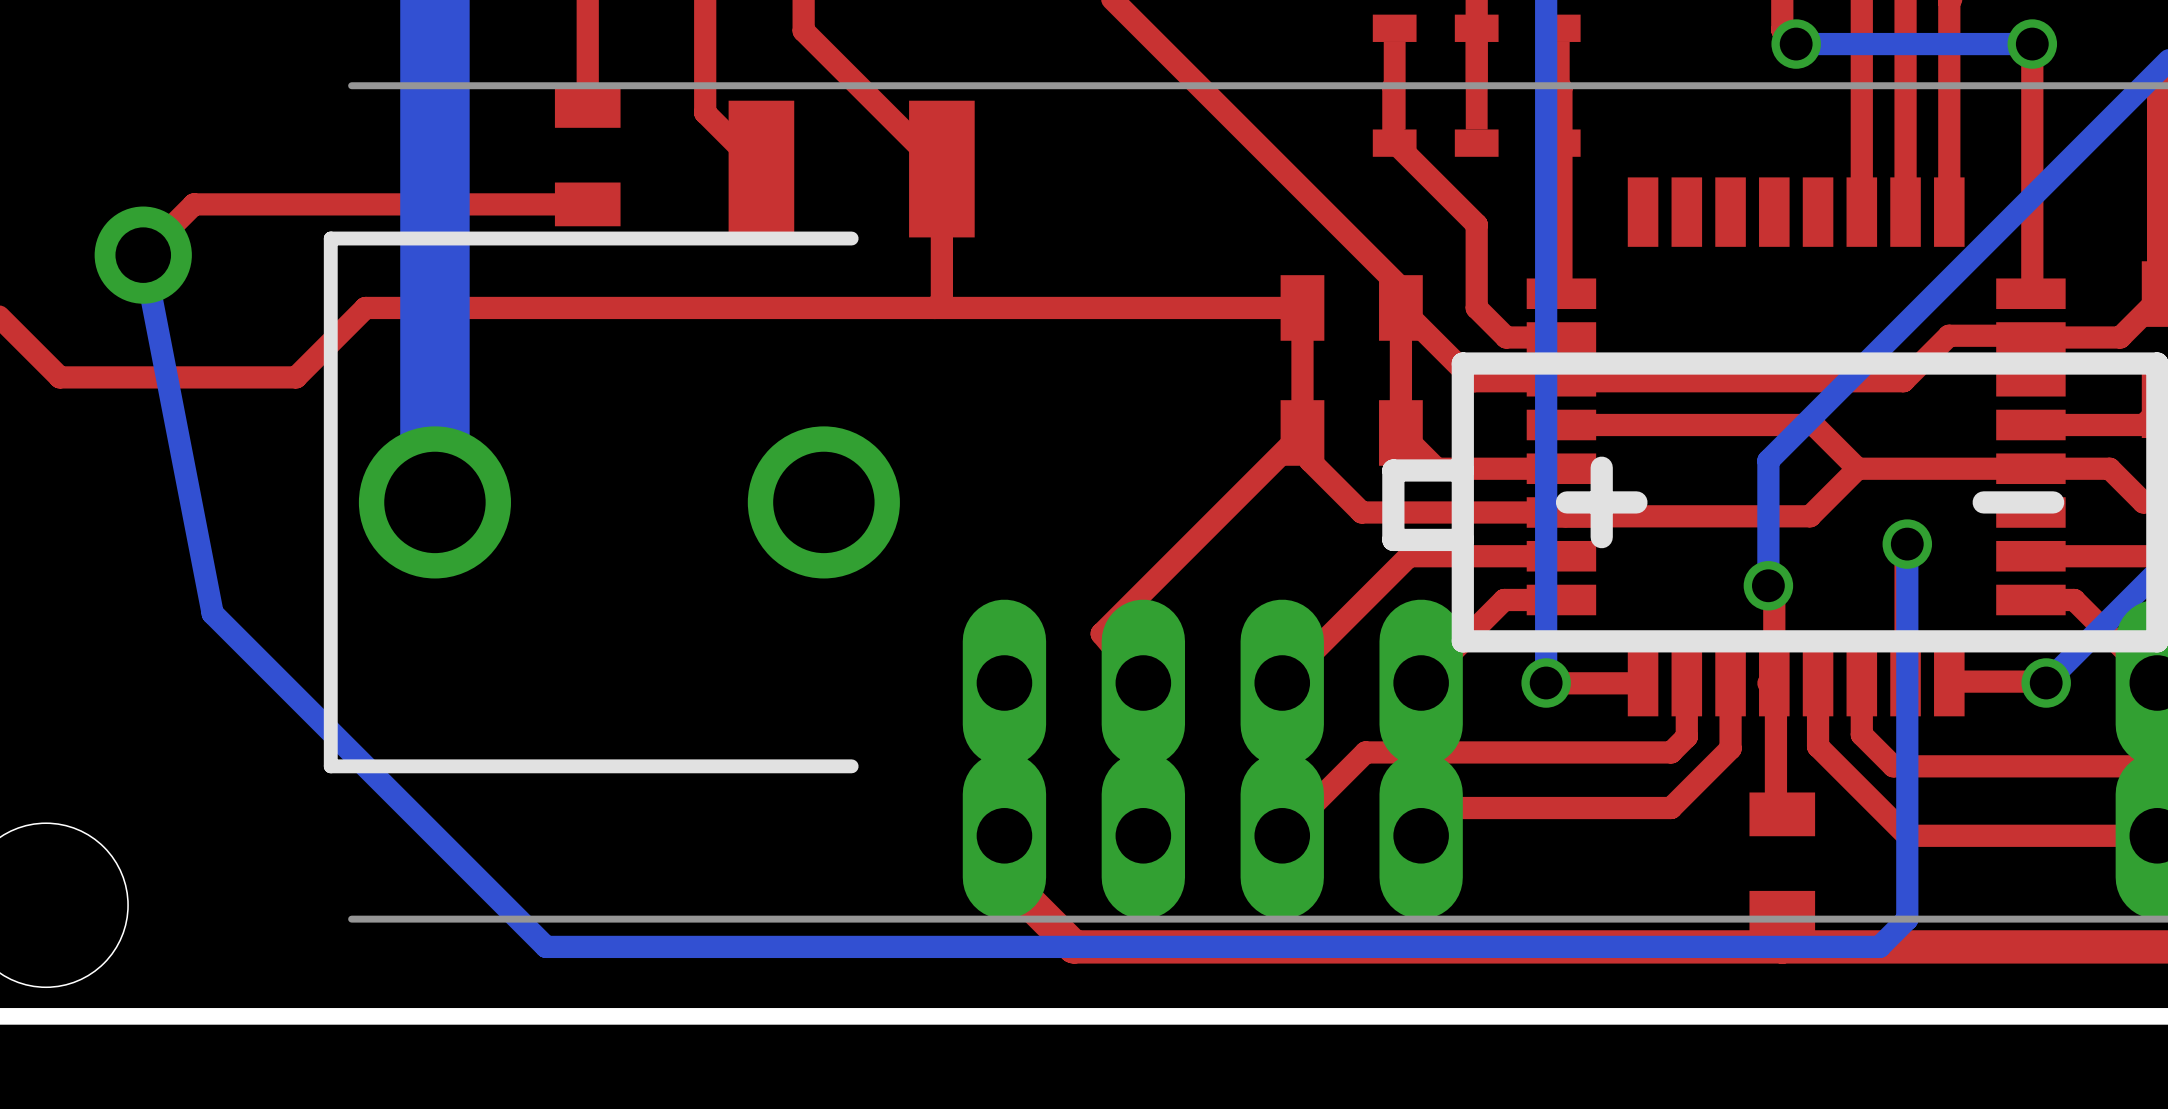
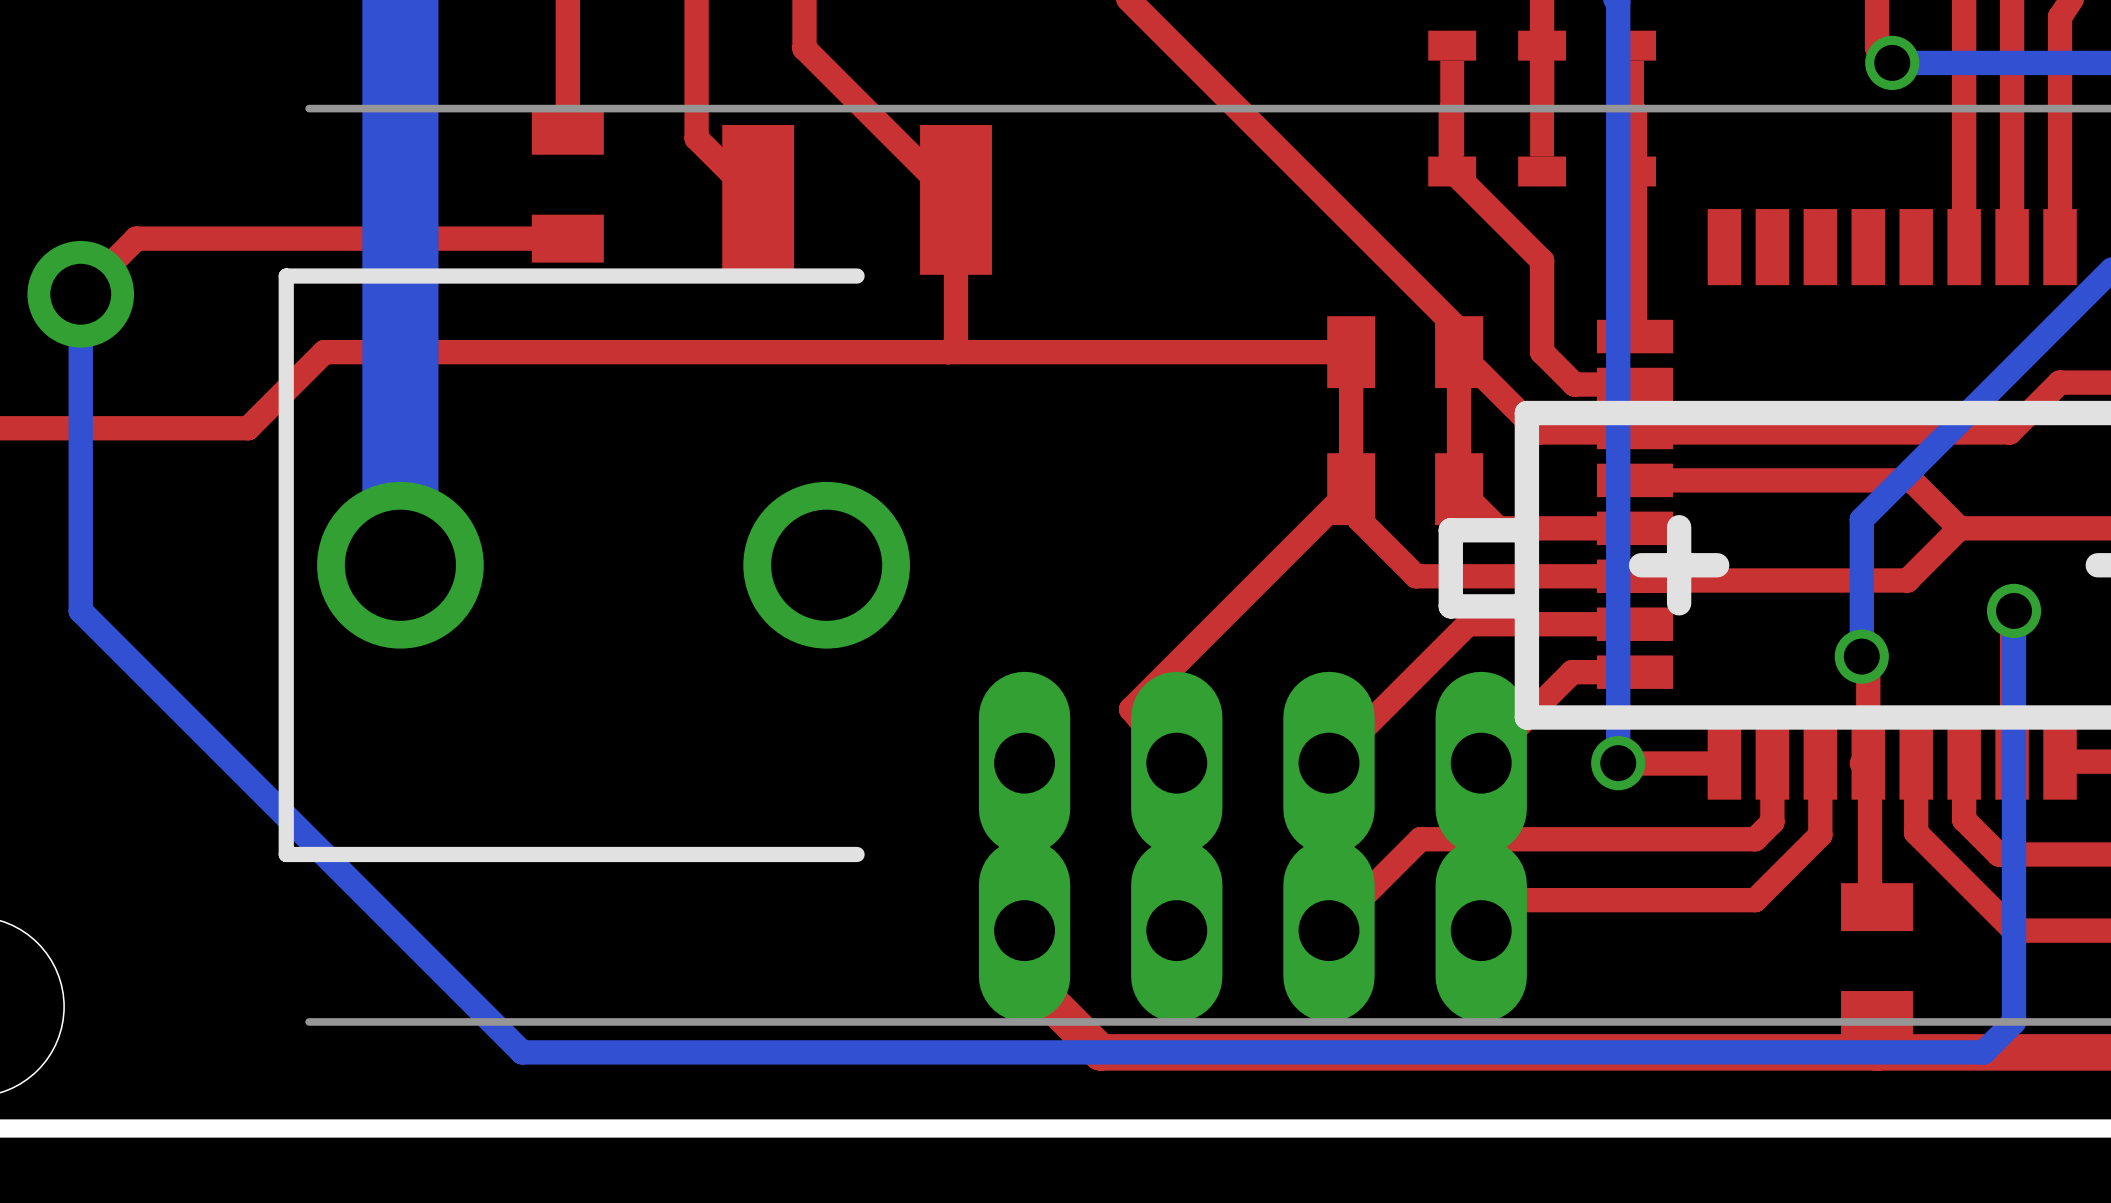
bottom track: (143, 255) (212, 613) -> (80, 294) (80, 610) (156, 687)

